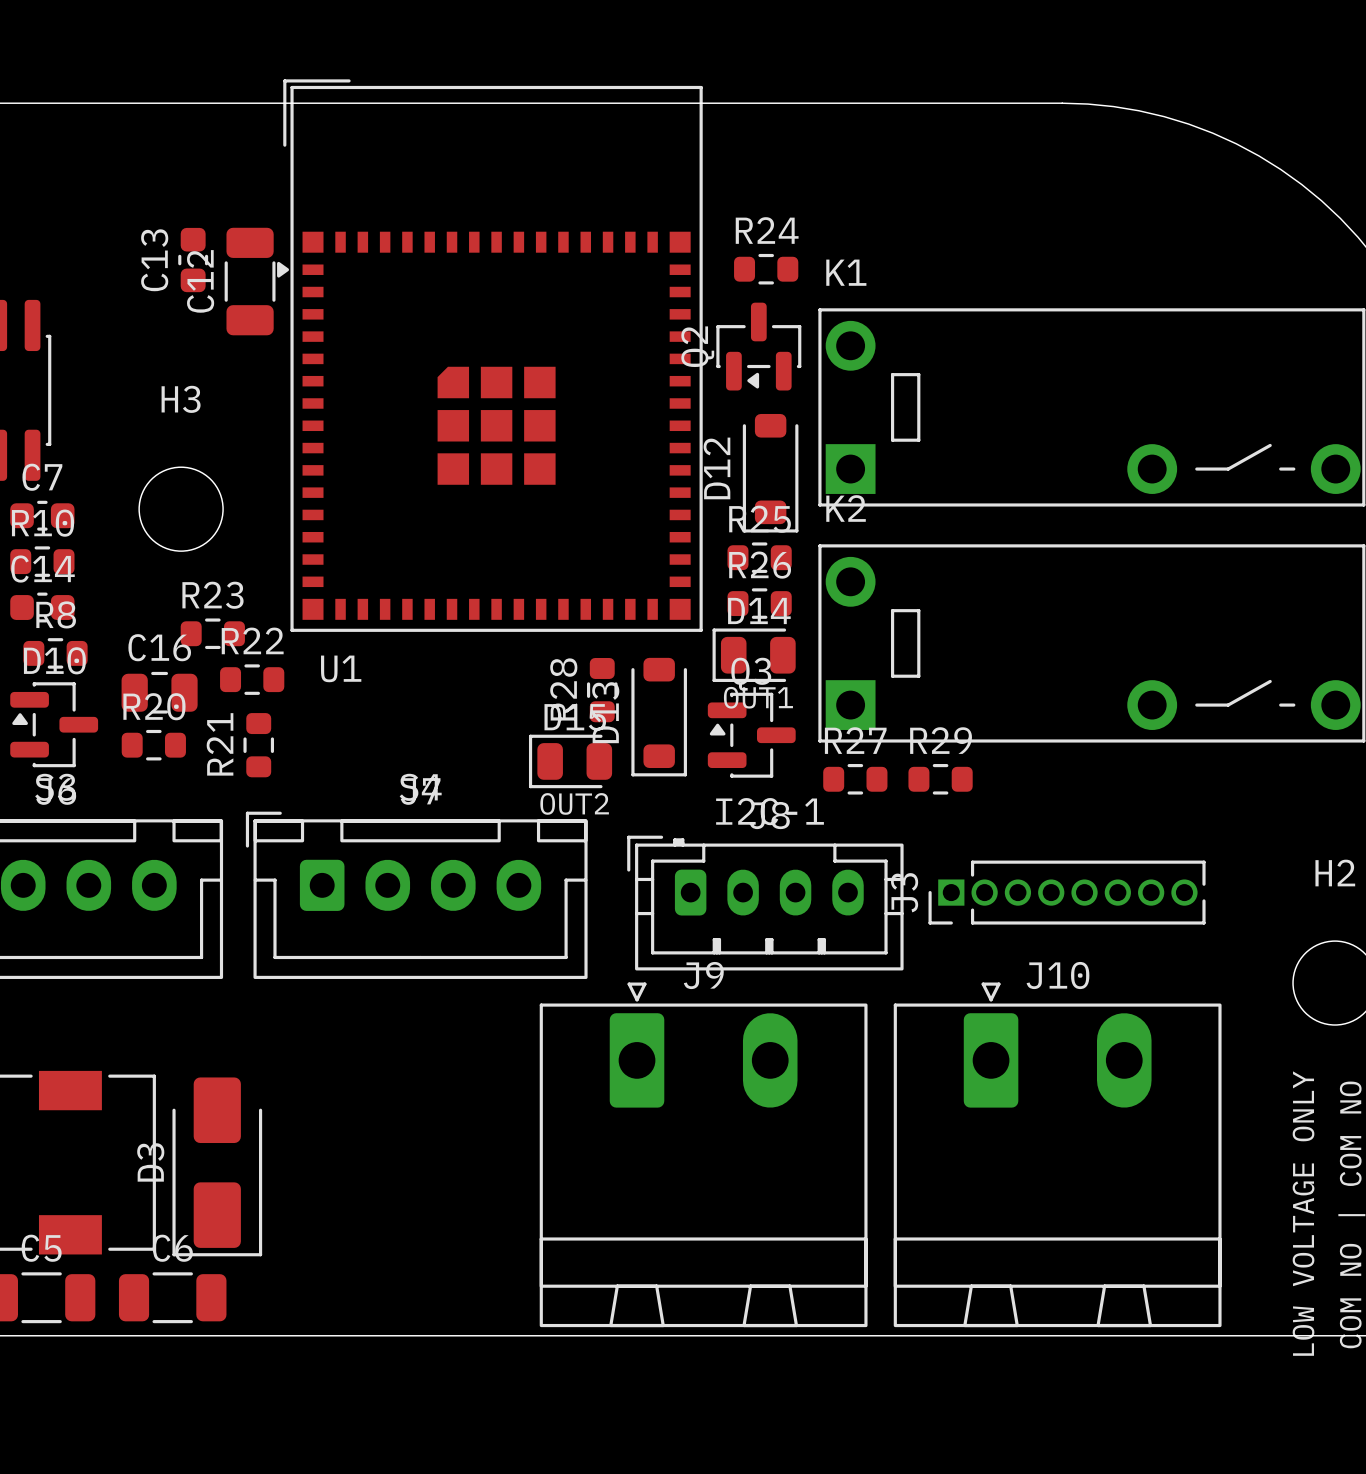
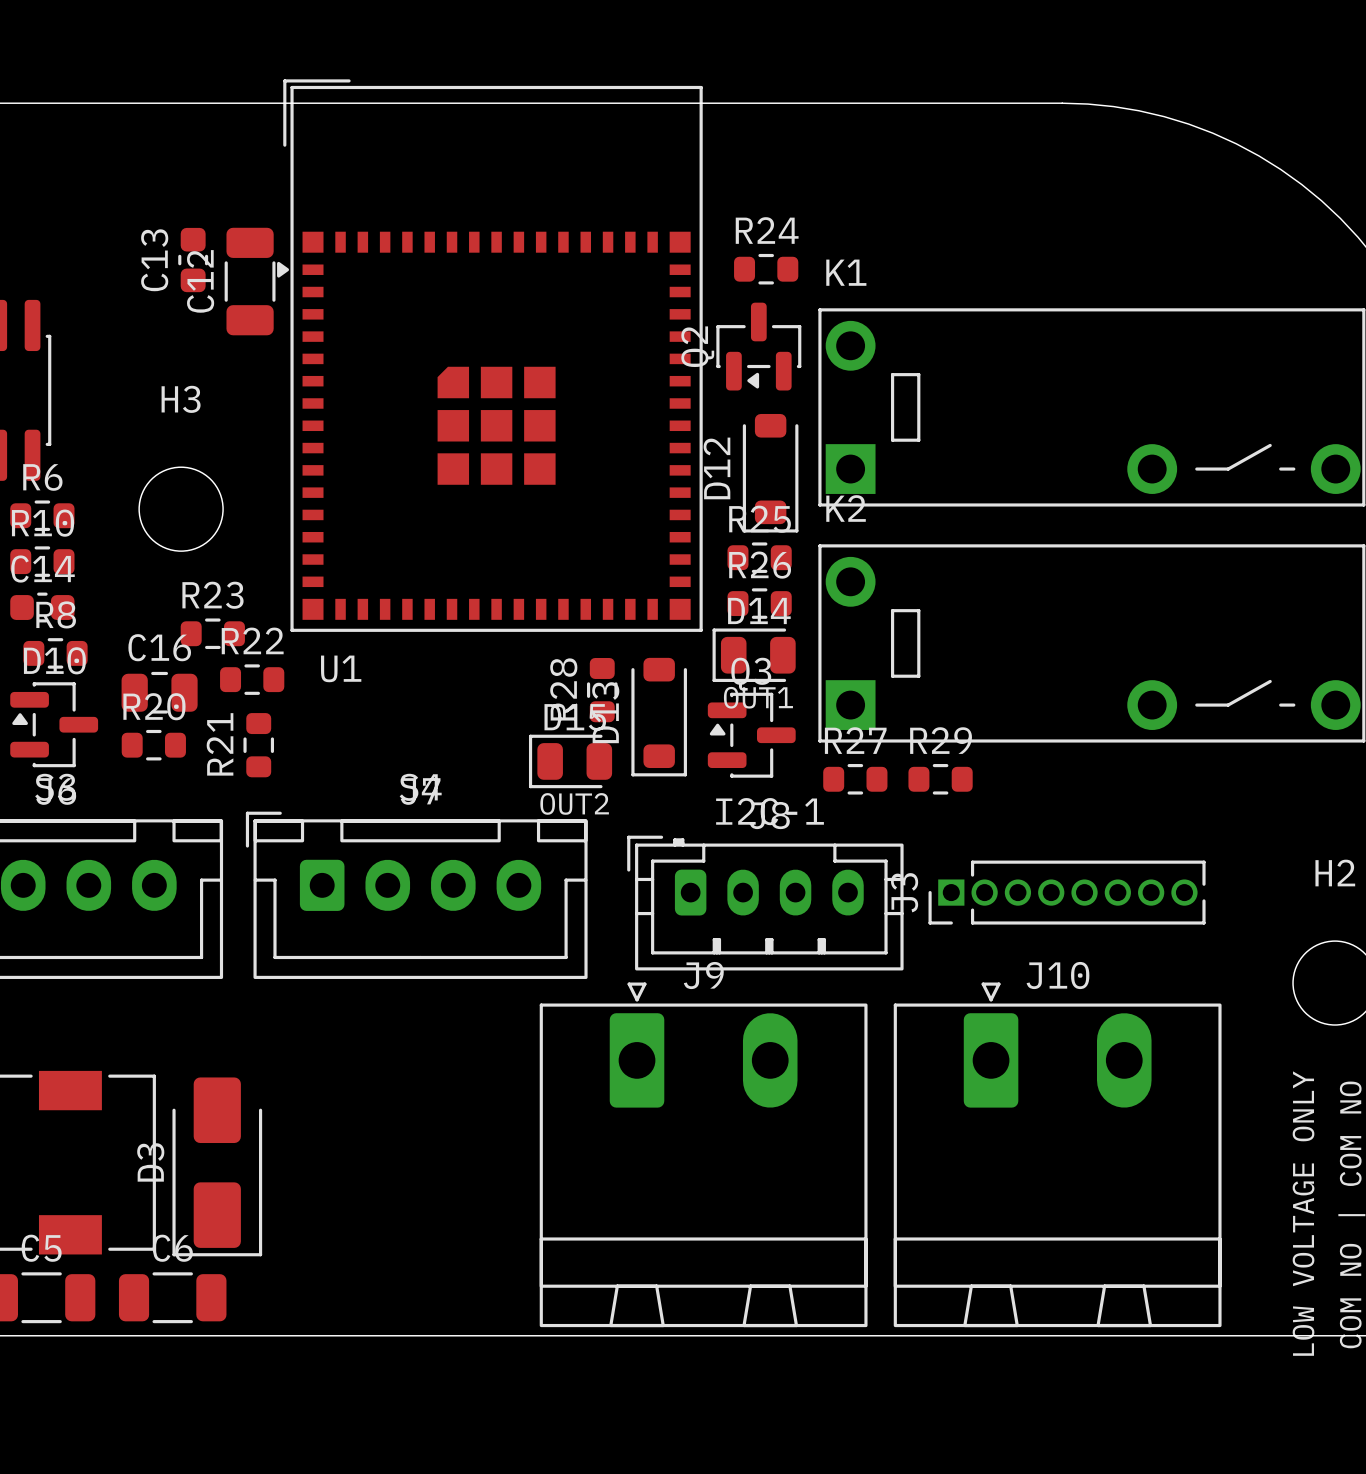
C7: (42, 515) -> none
R6: none -> (42, 515)

